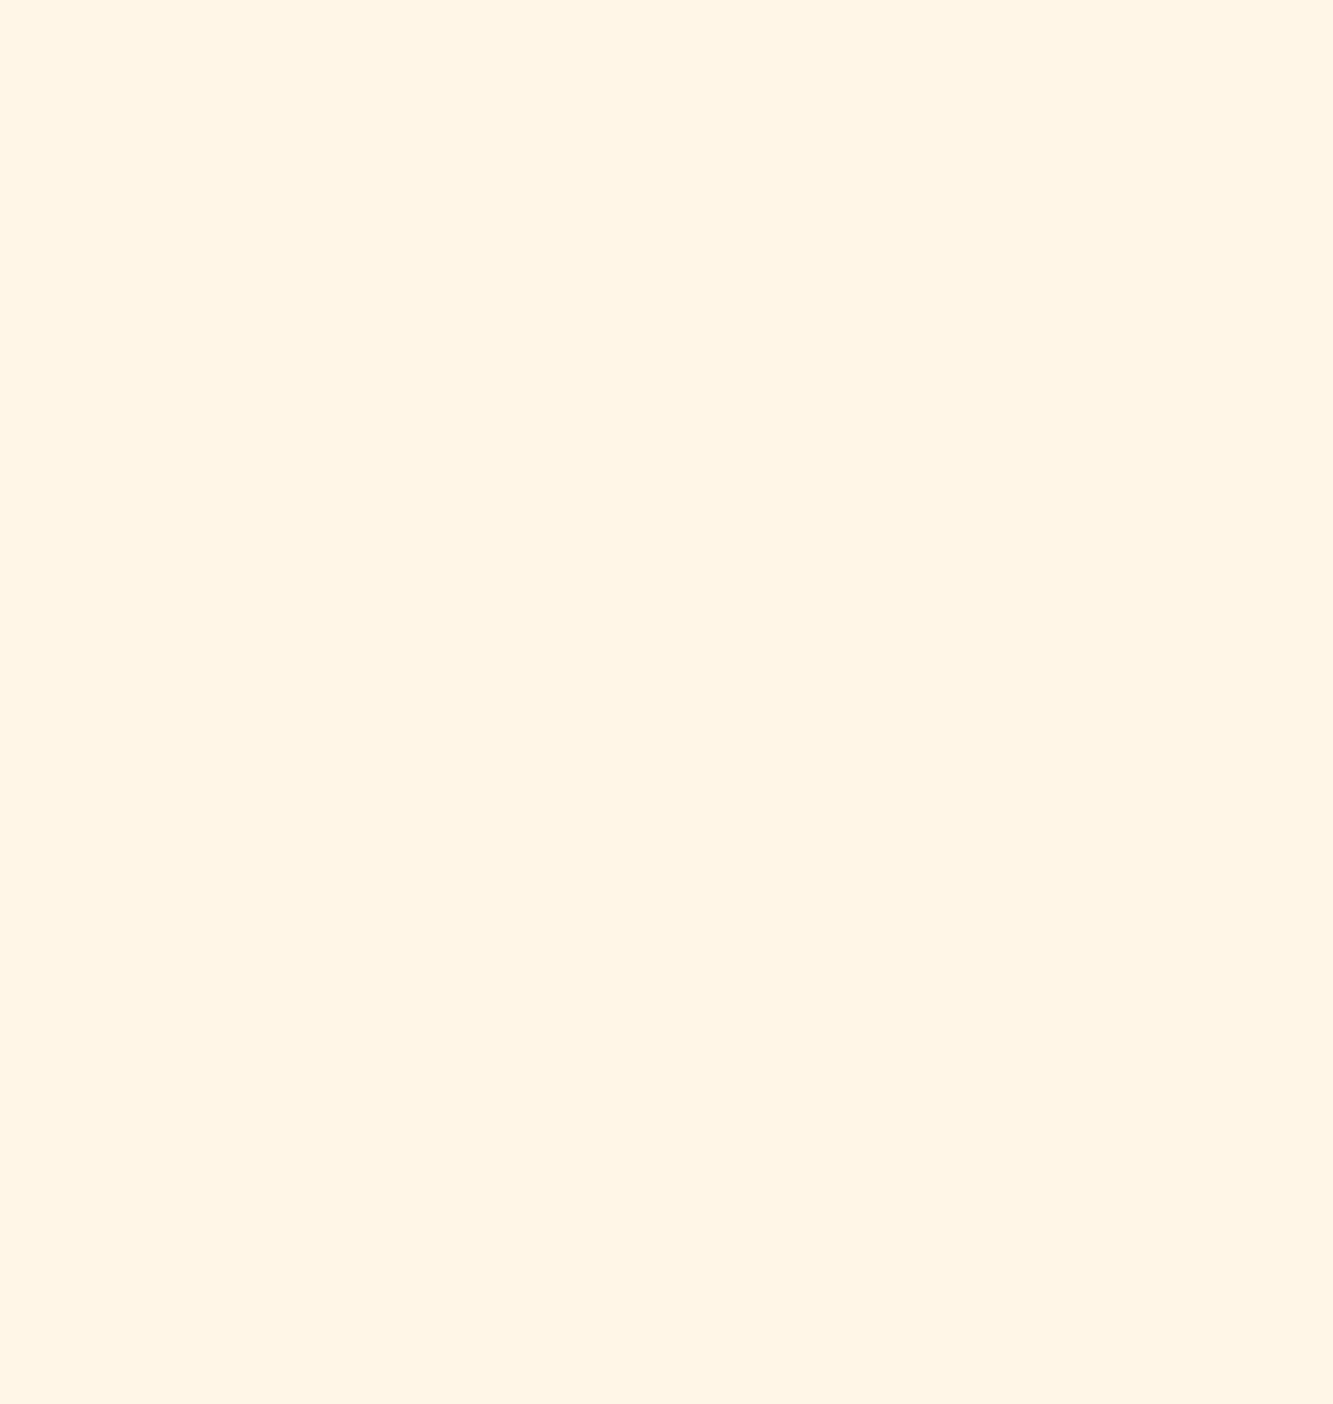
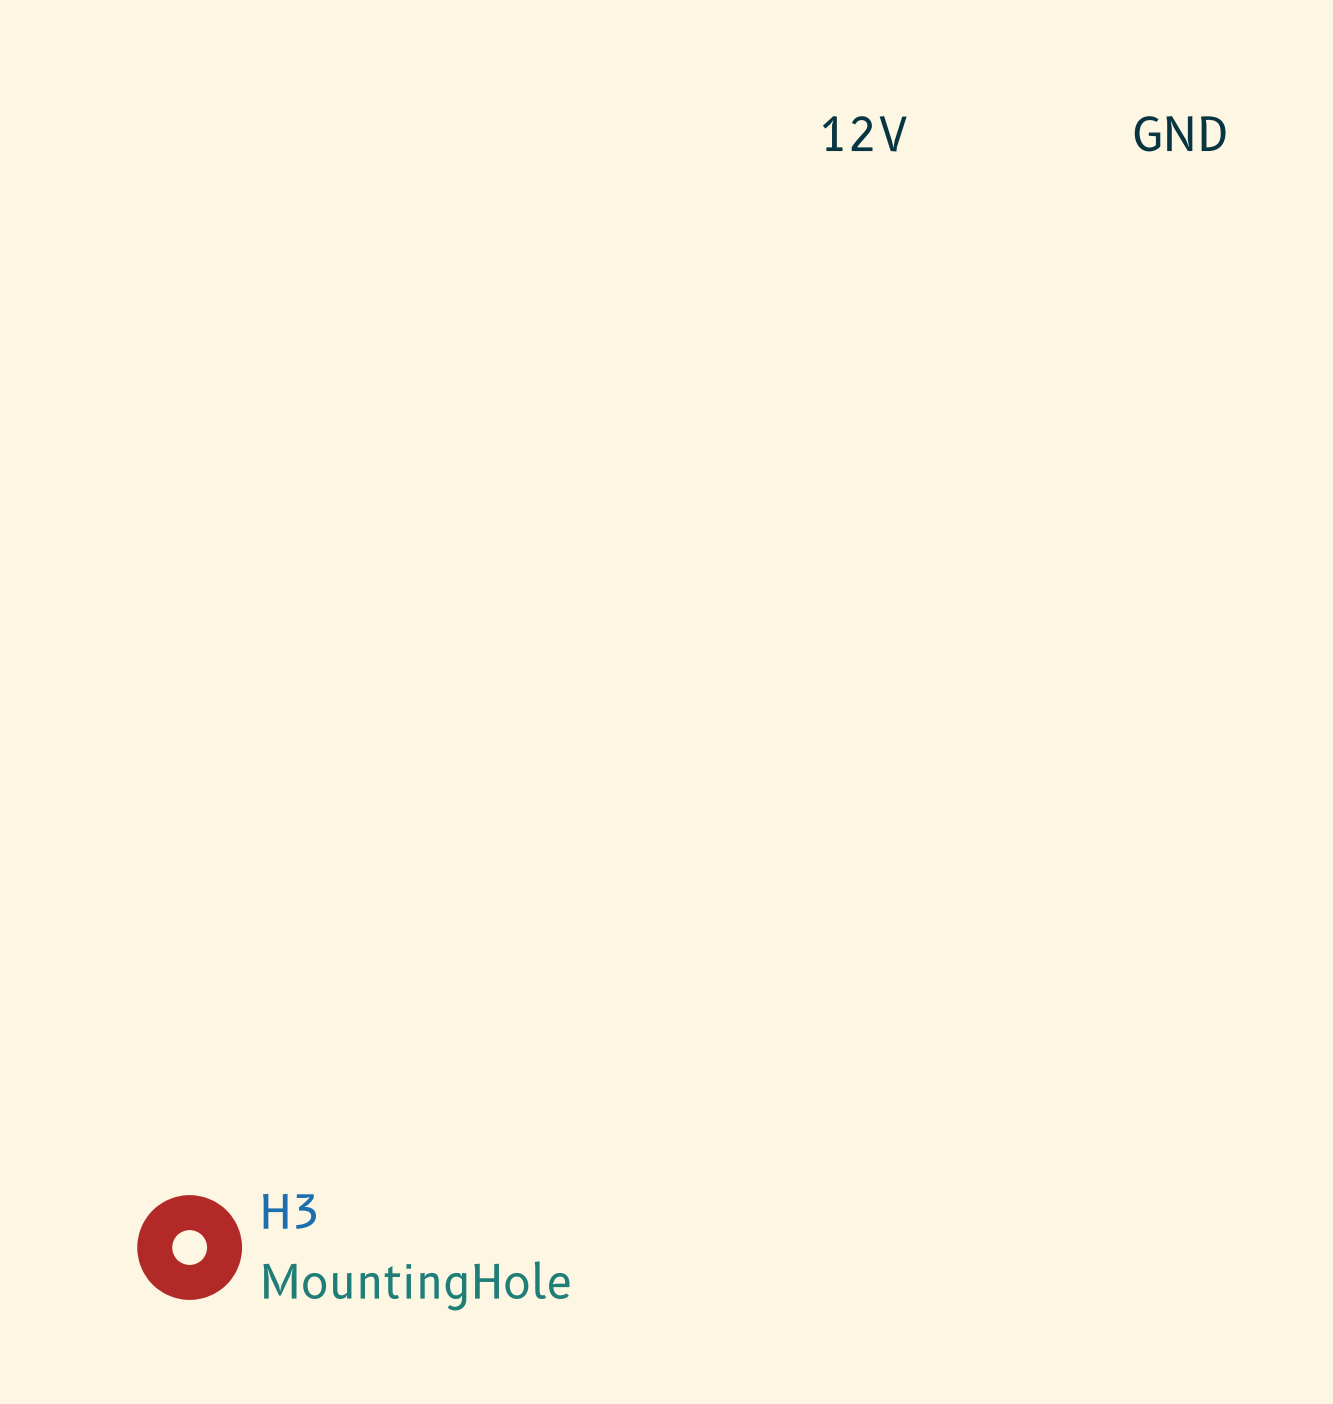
label: none -> 12V (864, 133)
label: none -> GND (1180, 133)
H3: none -> MountingHole (189, 1247)

